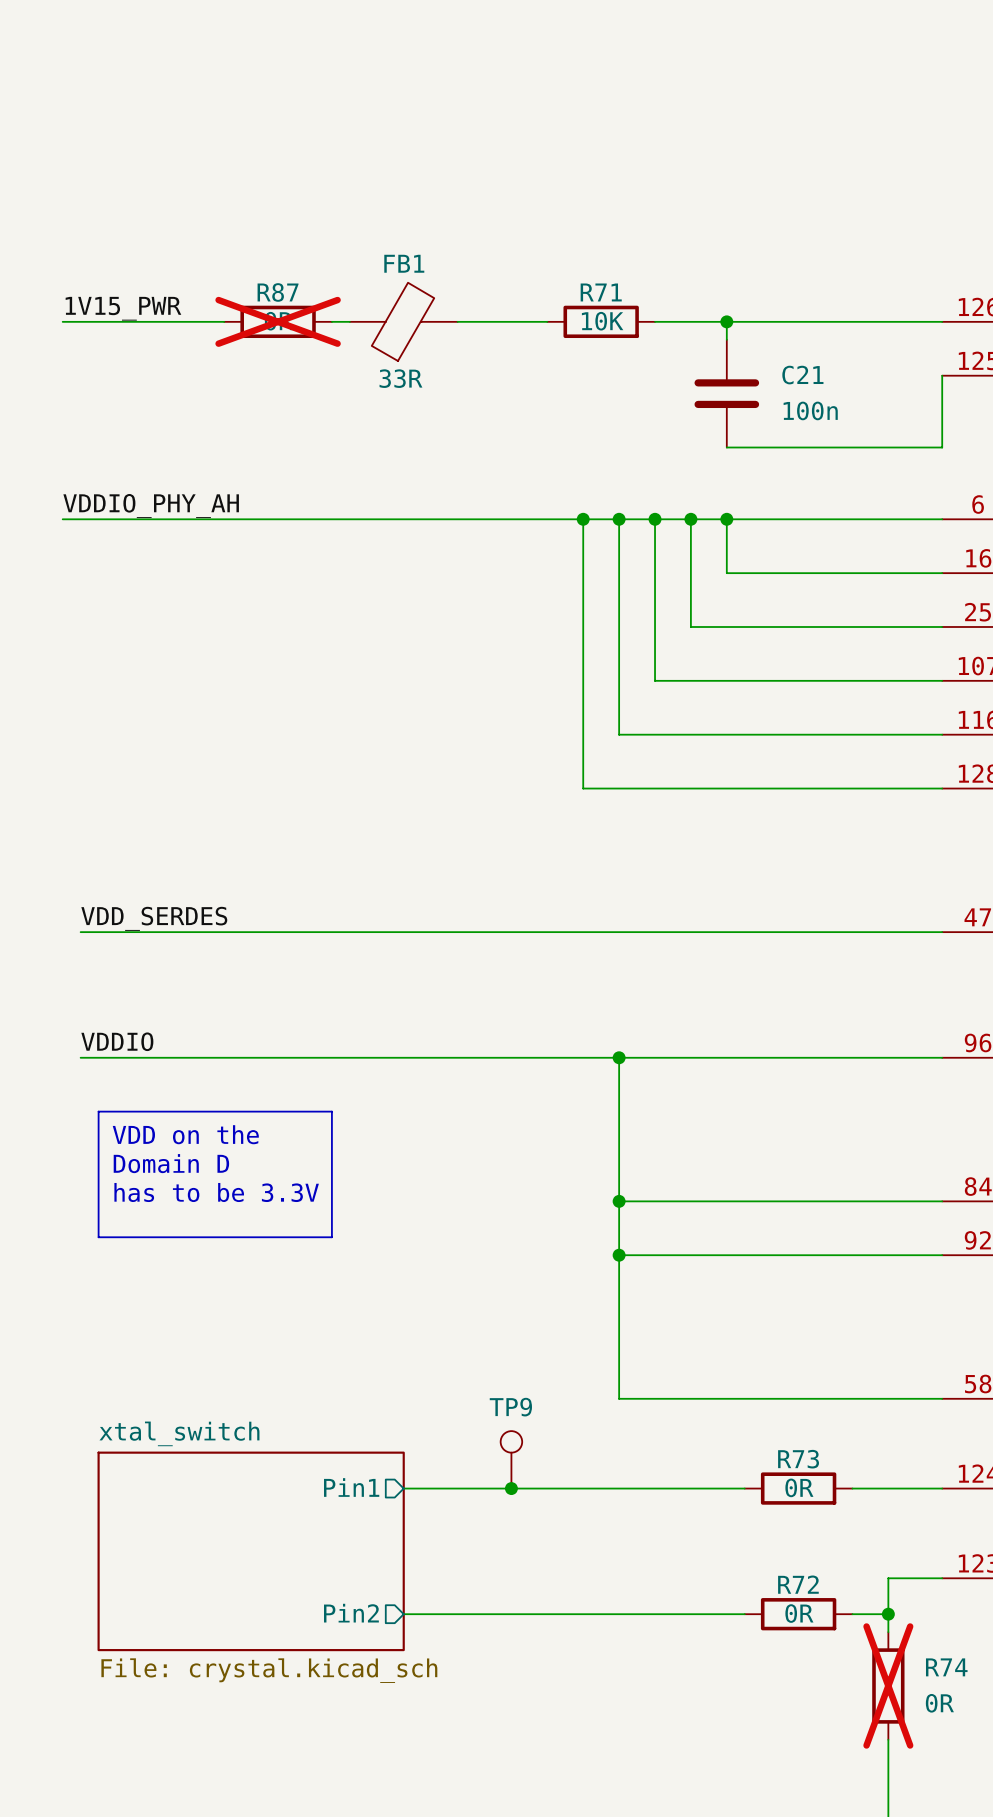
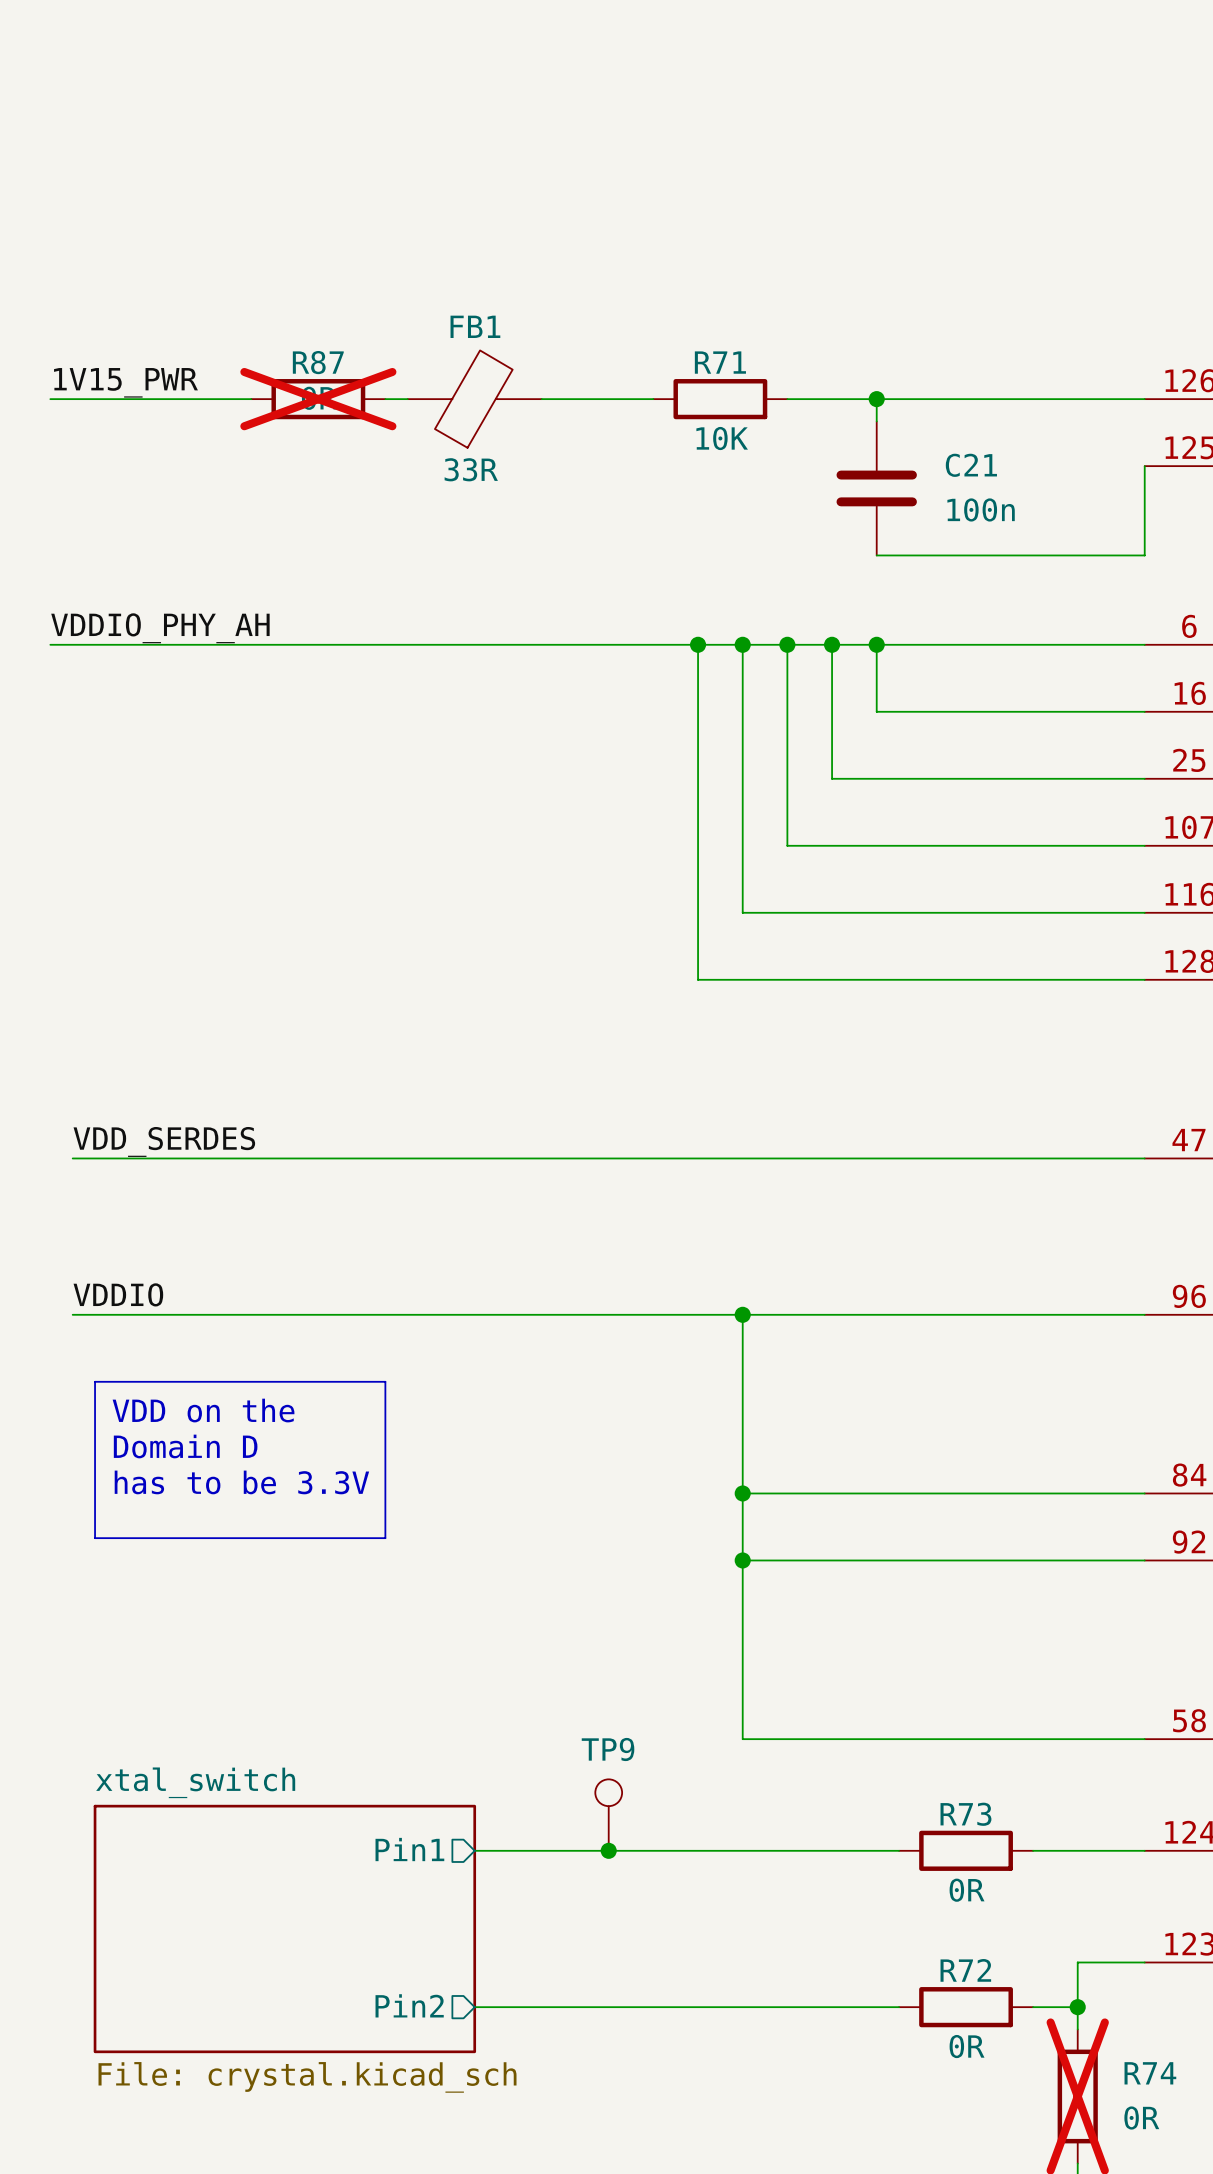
R71 value position: 10K (602, 321) -> 10K (722, 438)
R73 value position: 0R (799, 1487) -> 0R (967, 1890)
R72 value position: 0R (799, 1613) -> 0R (967, 2046)

